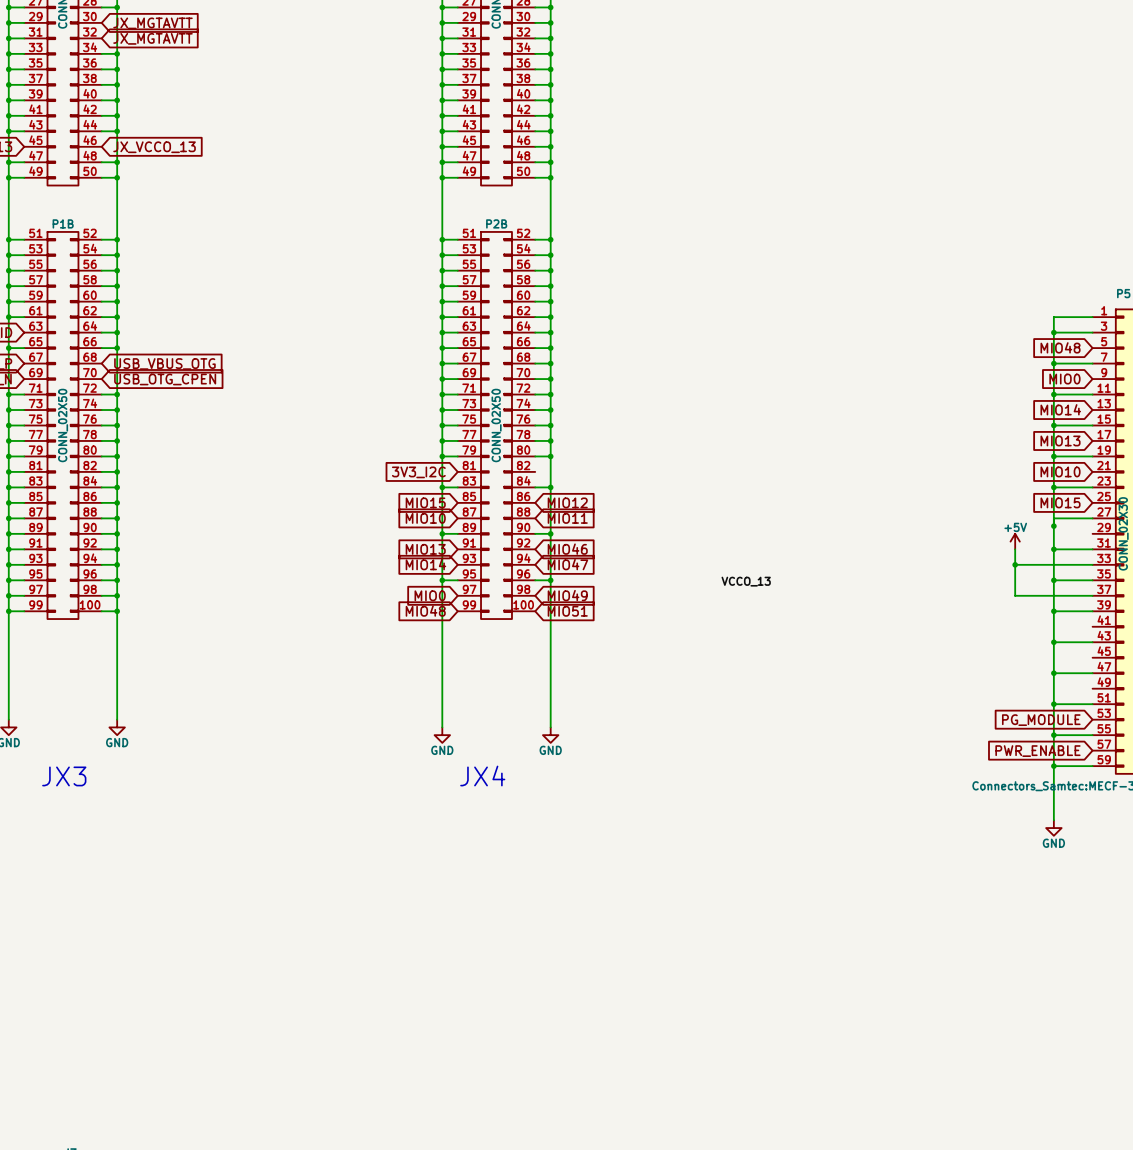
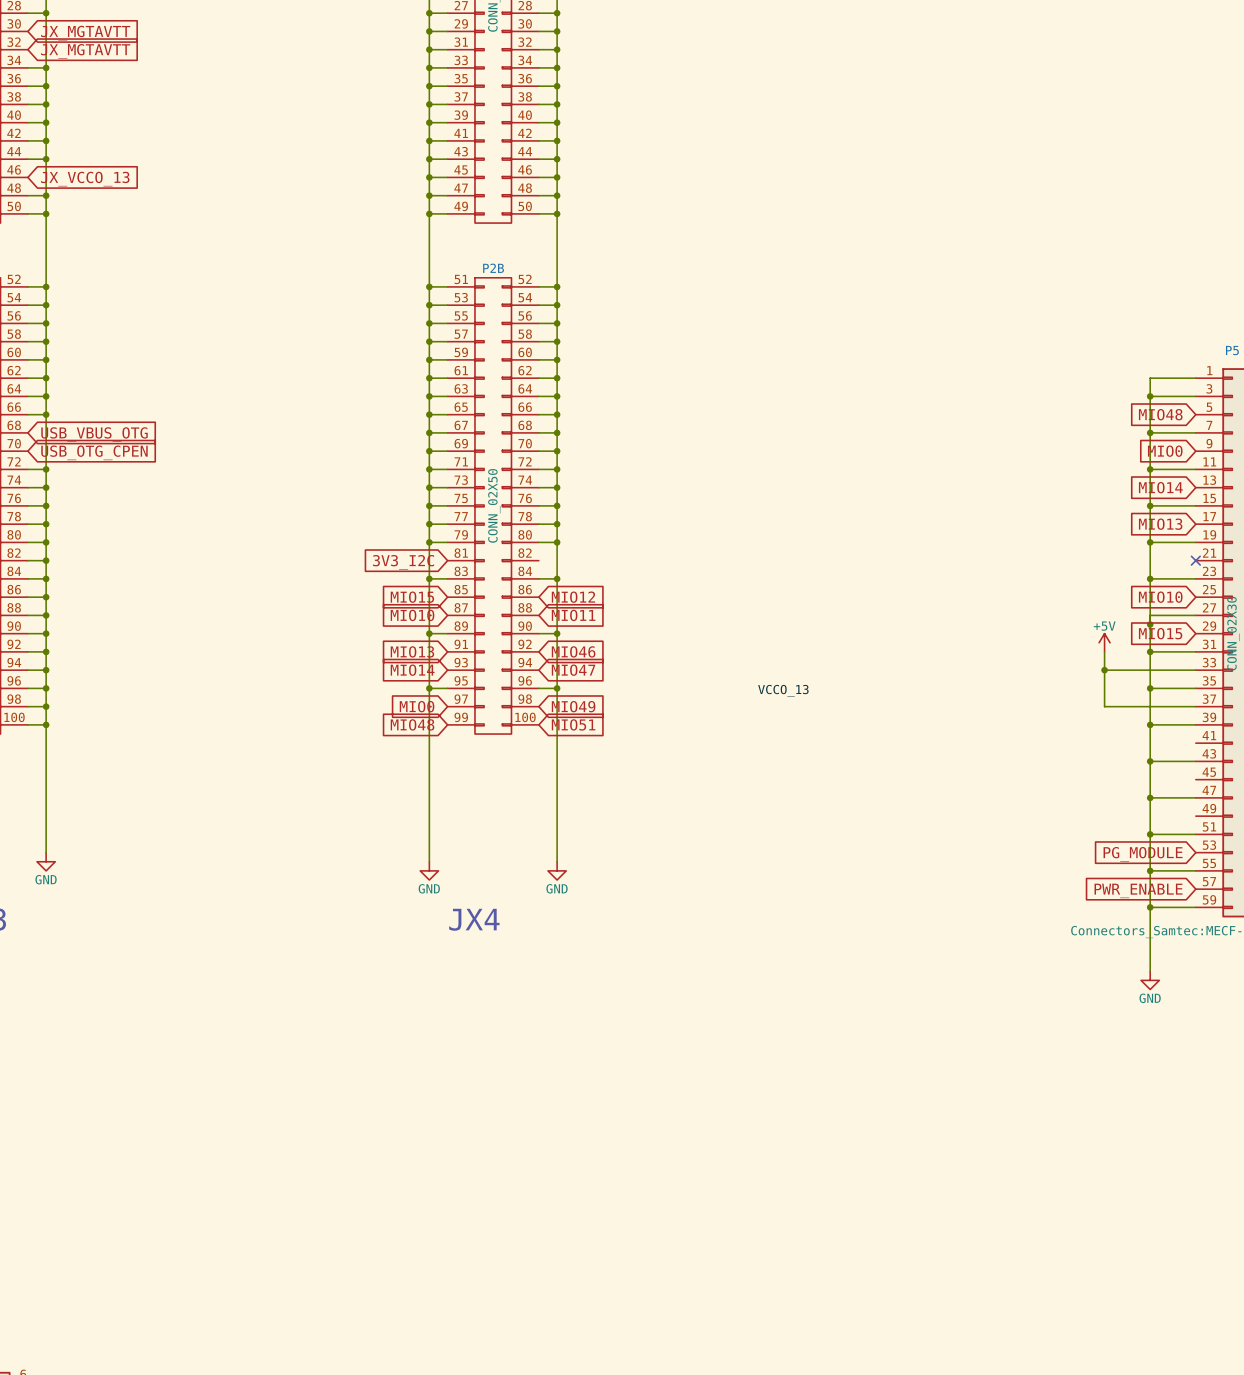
global label: MIO10 (1060, 471) -> none
no-connect mark: none -> (1195, 560)
global label: MIO15 (1060, 502) -> MIO10 (1160, 597)
global label: none -> MIO15 (1160, 633)

